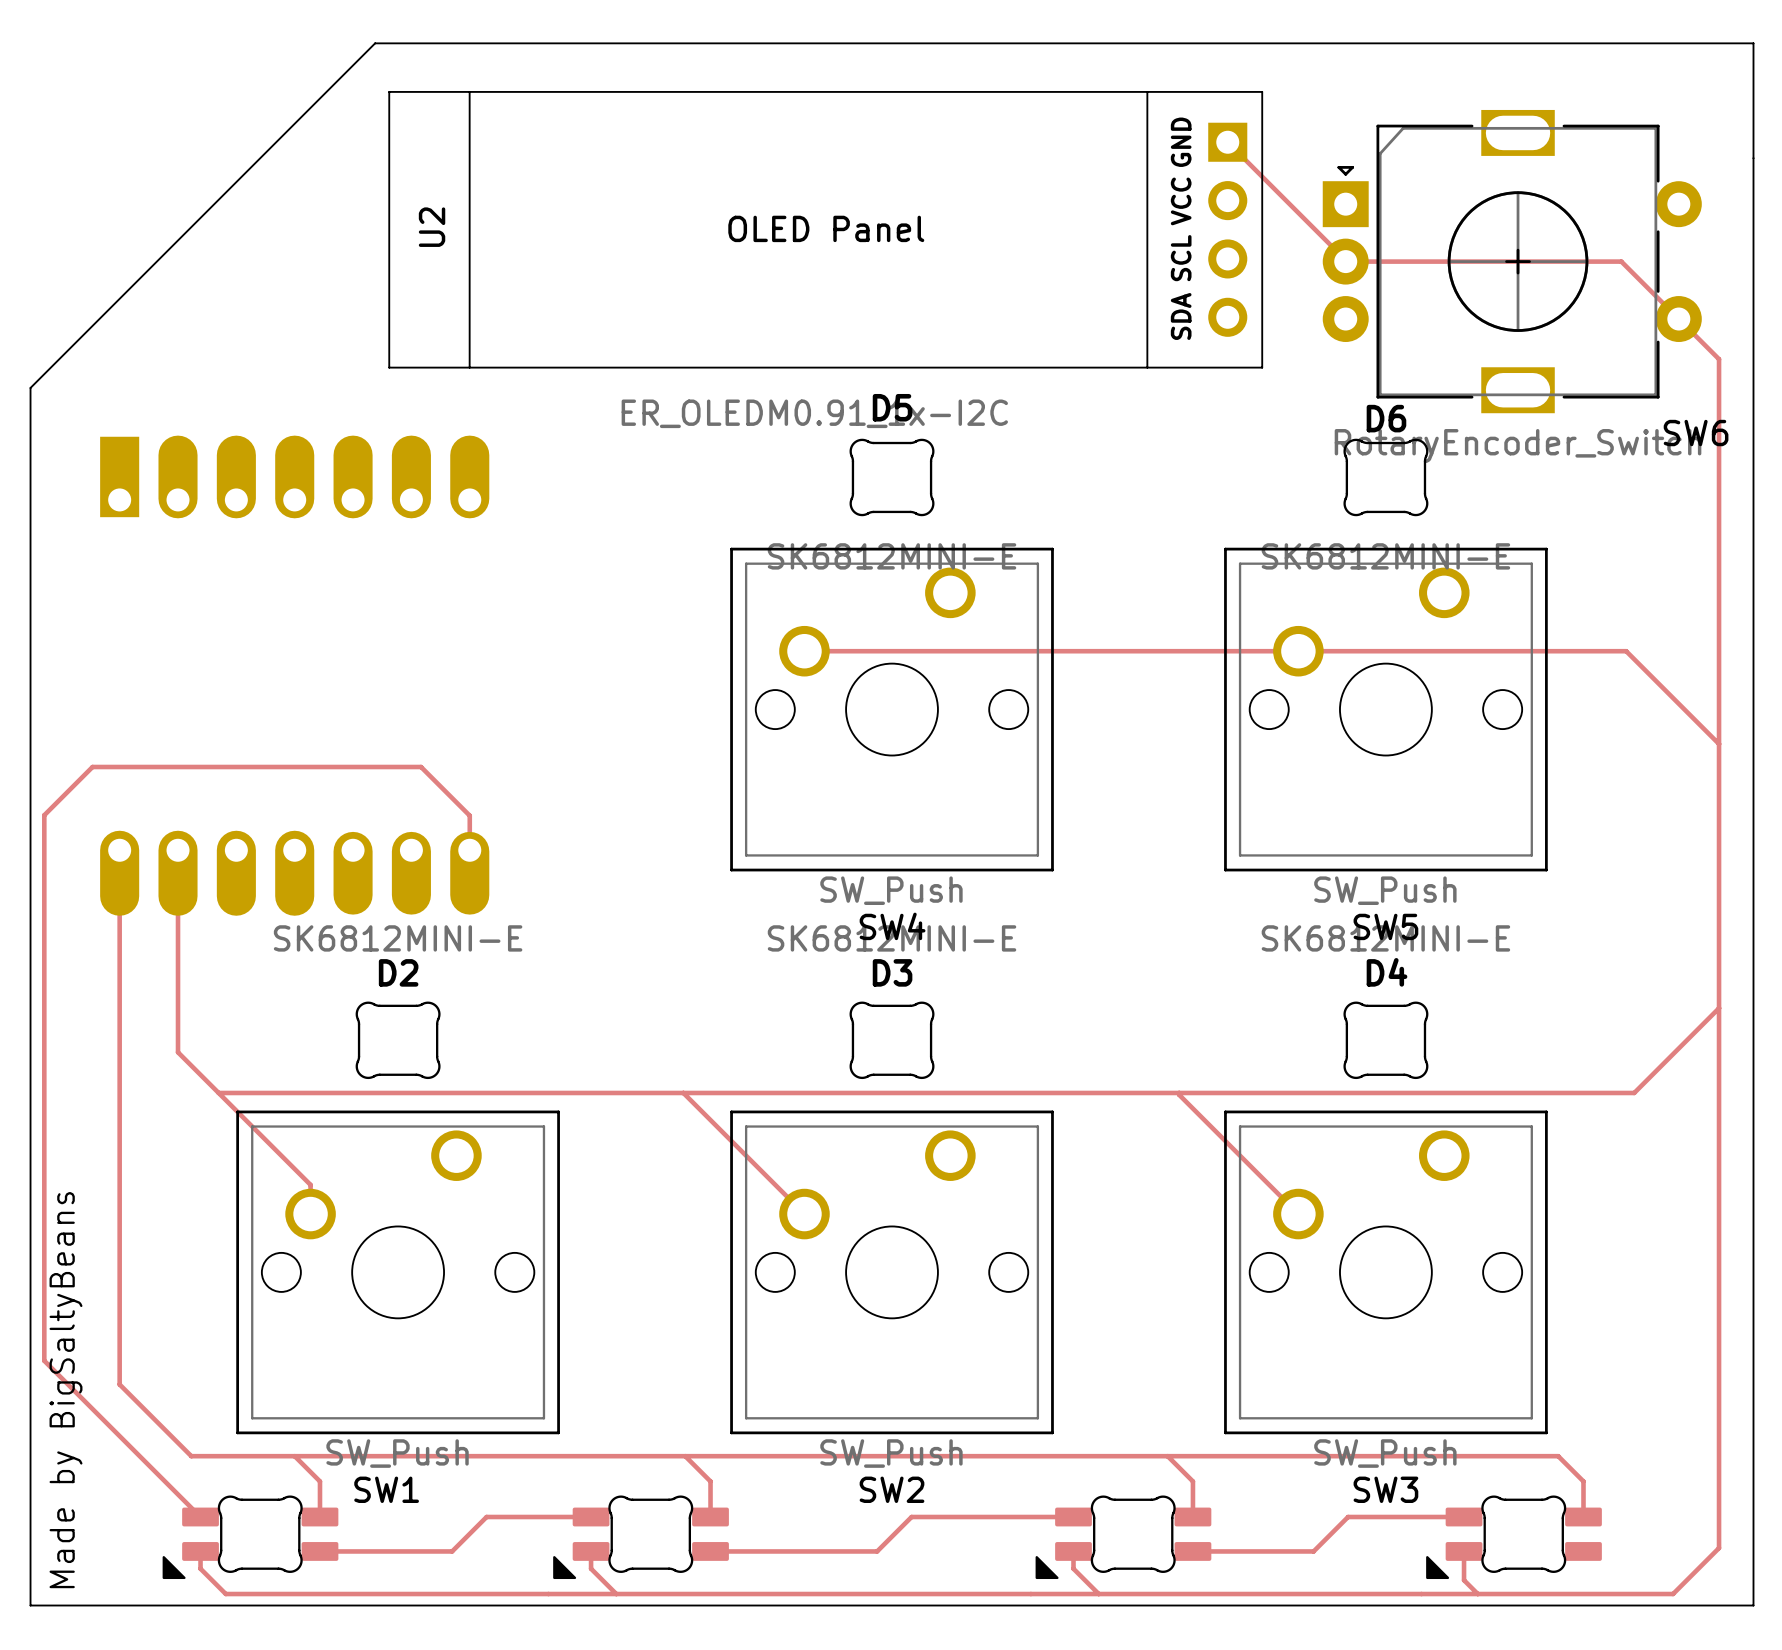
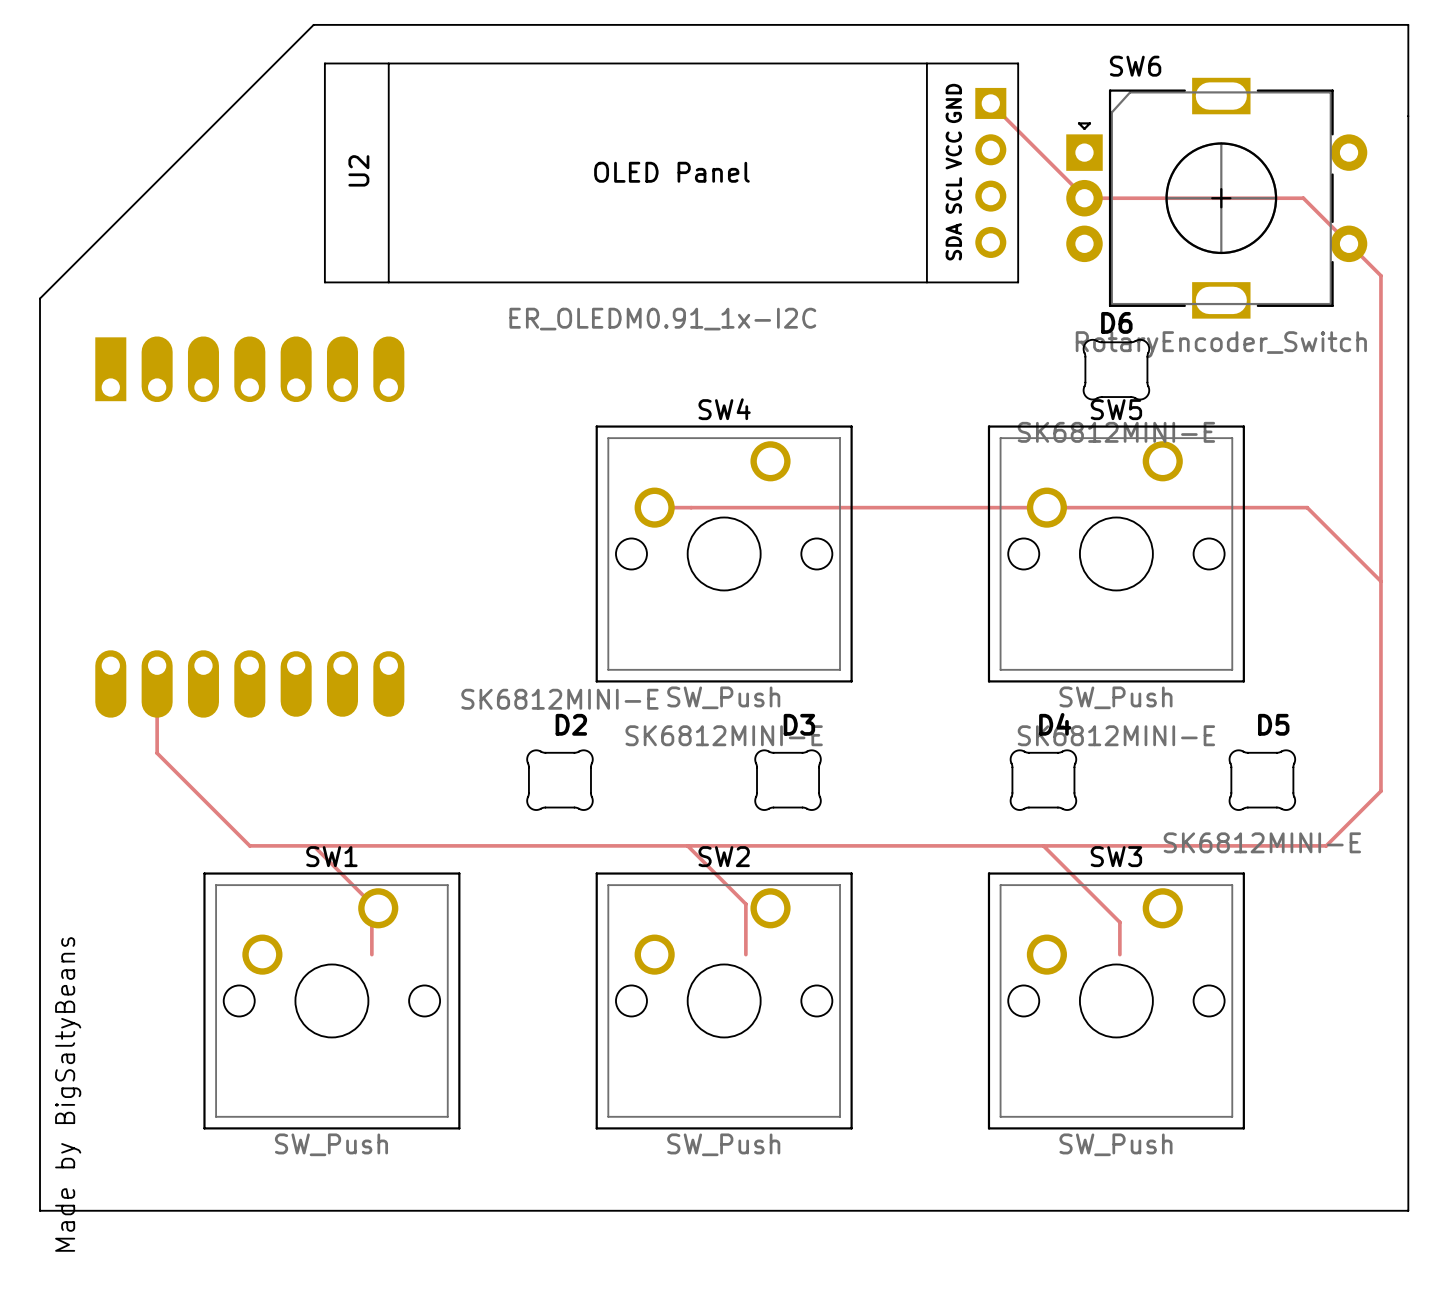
D5 name position: D5 (892, 407) -> D5 (1273, 724)
SW6 name position: SW6 (1696, 433) -> SW6 (1135, 66)
D5 position: (892, 477) -> (1262, 780)
track: (119, 850) (119, 1384) (191, 1456) (1558, 1456) (1583, 1481) (1583, 1517) -> none
track: (469, 850) (469, 815) (421, 766) (92, 766) (44, 815) (44, 1360) (200, 1517) -> none
SW4 name position: SW4 (892, 926) -> SW4 (724, 409)
SW5 name position: SW5 (1385, 926) -> SW5 (1116, 409)
track: (178, 960) (178, 1052) (310, 1184) (310, 1214) -> none
D2 name position: D2 (398, 972) -> D2 (571, 724)
D3 name position: D3 (892, 972) -> D3 (799, 724)
D4 name position: D4 (1387, 972) -> D4 (1055, 724)
track: (1719, 1008) (1719, 1548) (1673, 1594) (225, 1594) (200, 1568) (200, 1551) -> none
D2 position: (398, 1040) -> (559, 780)
D3 position: (892, 1040) -> (788, 780)
D4 position: (1385, 1040) -> (1043, 780)
track: none -> (313, 845) (371, 904) (371, 954)
track: none -> (687, 845) (745, 904) (745, 954)
track: none -> (1043, 845) (1119, 922) (1119, 954)
track: (1650, 1077) (1634, 1092) (218, 1092) -> (1326, 845) (249, 845) (157, 753)
track: (683, 1092) (804, 1214) -> none
track: (1179, 1092) (1298, 1214) -> none
track: (294, 1456) (319, 1481) (319, 1517) -> none
track: (685, 1456) (710, 1481) (710, 1517) -> none
track: (1167, 1456) (1192, 1481) (1192, 1517) -> none
SW1 name position: SW1 (386, 1489) -> SW1 (331, 856)
SW2 name position: SW2 (892, 1489) -> SW2 (724, 856)
SW3 name position: SW3 (1385, 1489) -> SW3 (1116, 856)
track: (591, 1517) (486, 1517) (452, 1551) (319, 1551) -> none
track: (1073, 1517) (911, 1517) (877, 1551) (710, 1551) -> none
track: (1464, 1517) (1348, 1517) (1313, 1551) (1192, 1551) -> none
board edge: (30, 1536) (30, 1605) (1753, 1605) (1753, 1536) -> (40, 1210) (1408, 1210)
part: (250, 1537) -> none
part: (641, 1537) -> none
part: (1123, 1537) -> none
part: (1514, 1537) -> none
track: (591, 1551) (591, 1568) (616, 1594) -> none
track: (1073, 1551) (1073, 1568) (1098, 1594) -> none
track: (1464, 1551) (1464, 1580) (1477, 1594) -> none

